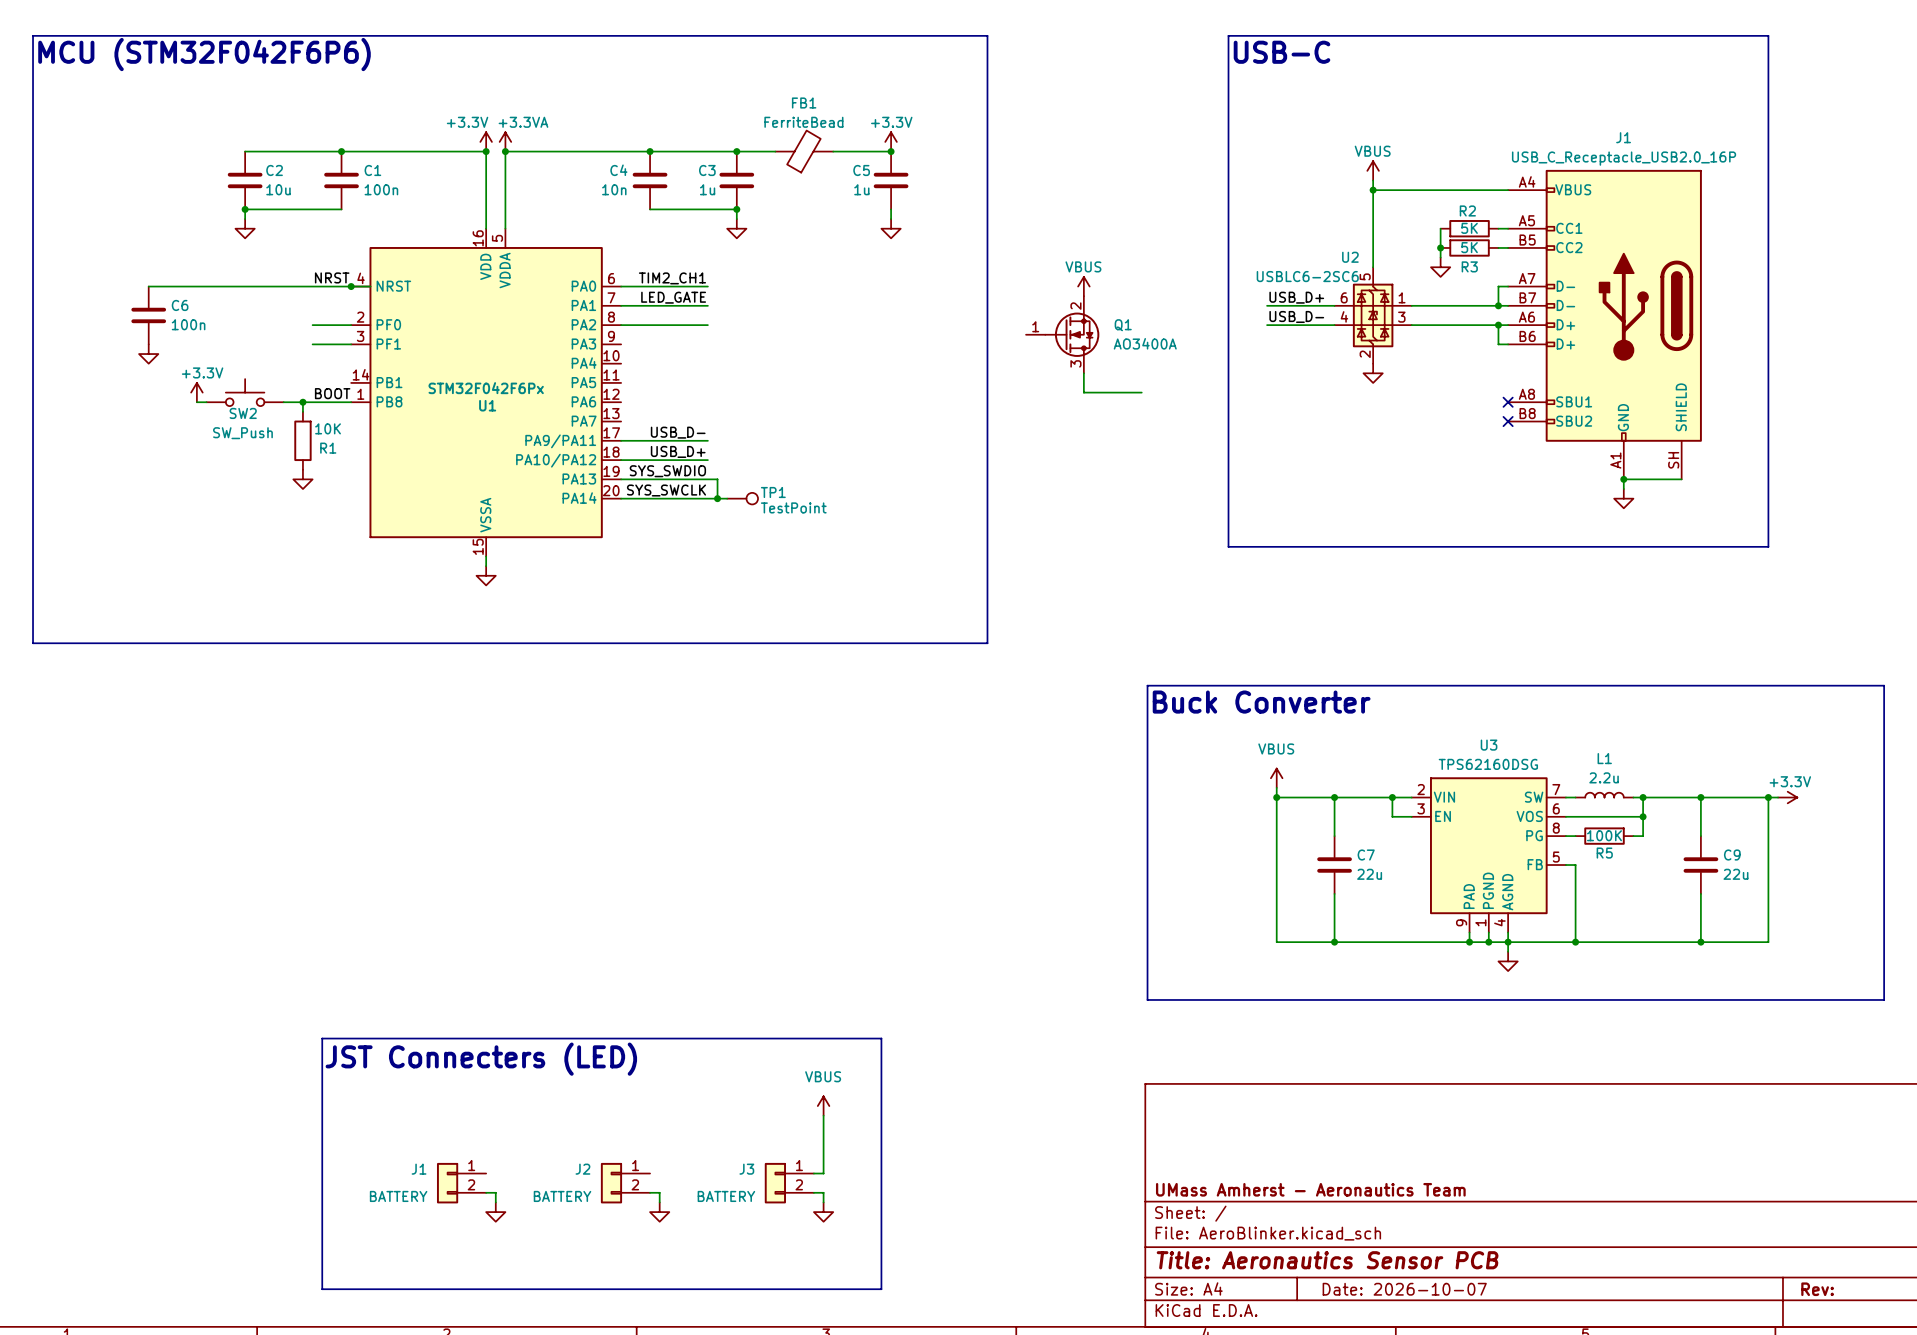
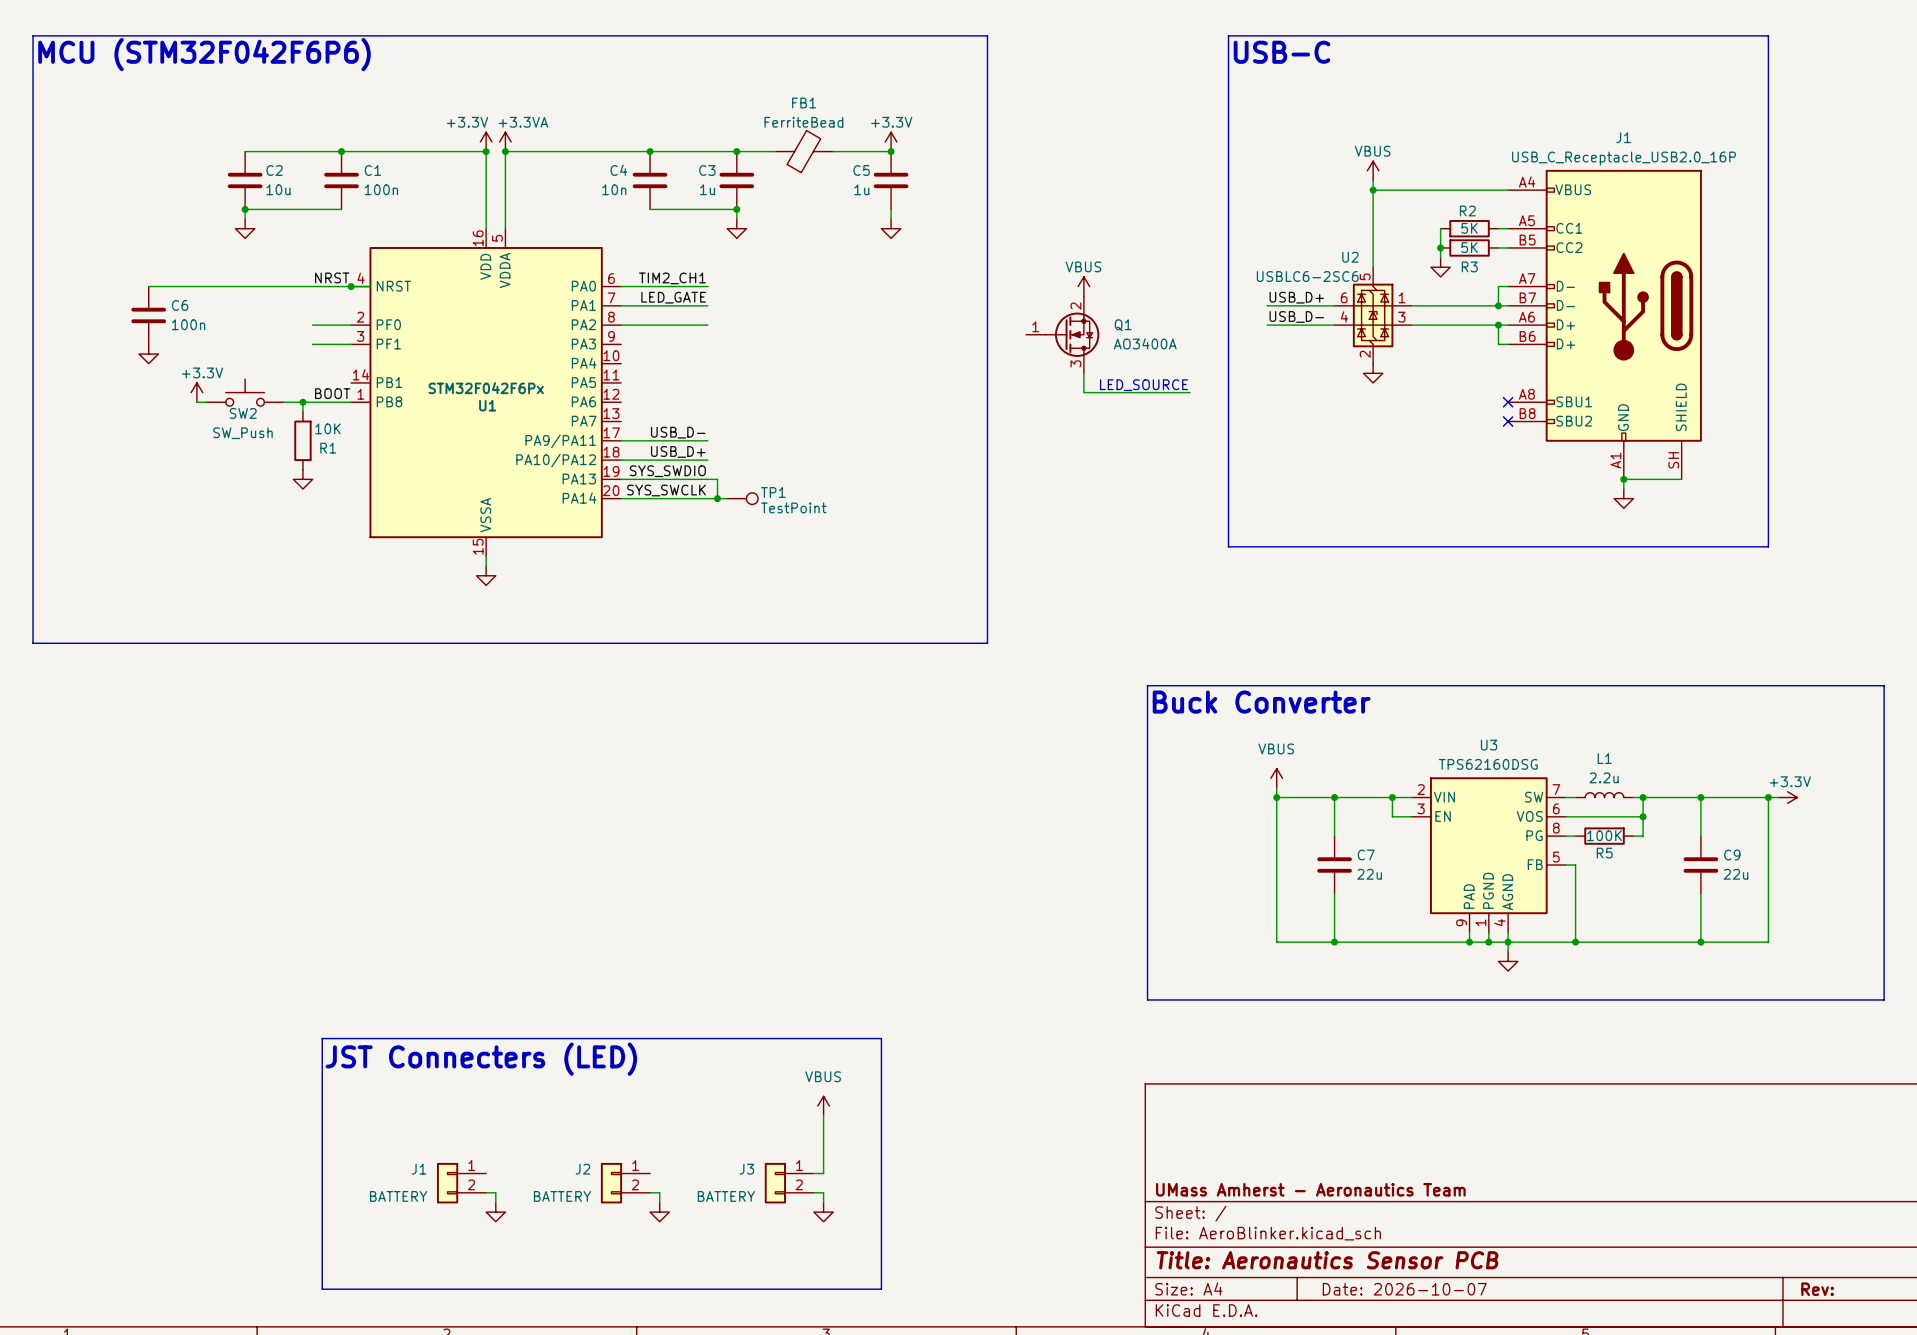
text: none -> LED_SOURCE (1143, 385)
wire: none -> (1141, 392) (1189, 392)

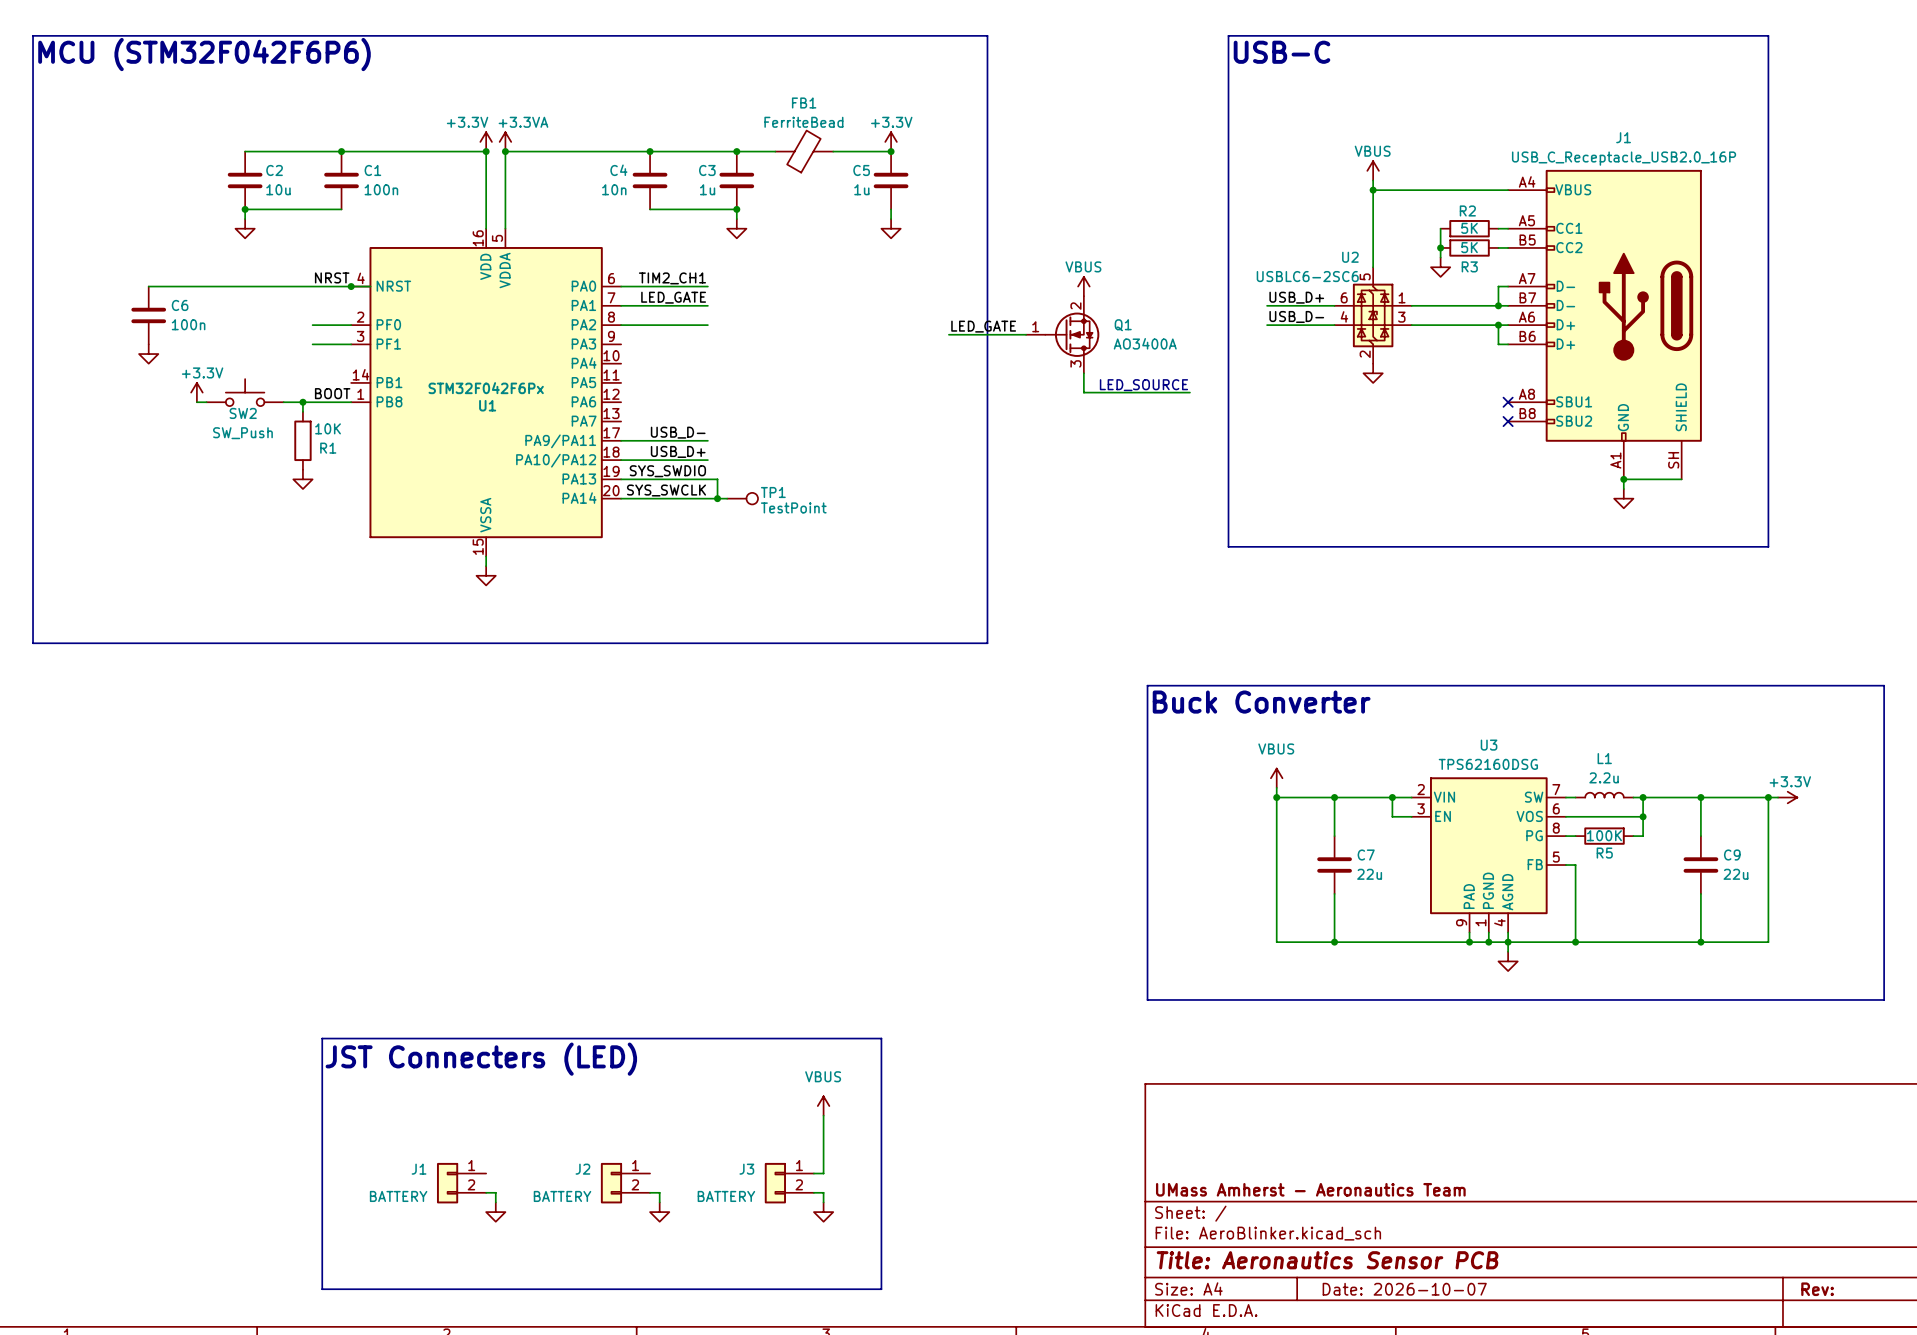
label: none -> LED_GATE (983, 326)
wire: none -> (948, 334) (1026, 334)

